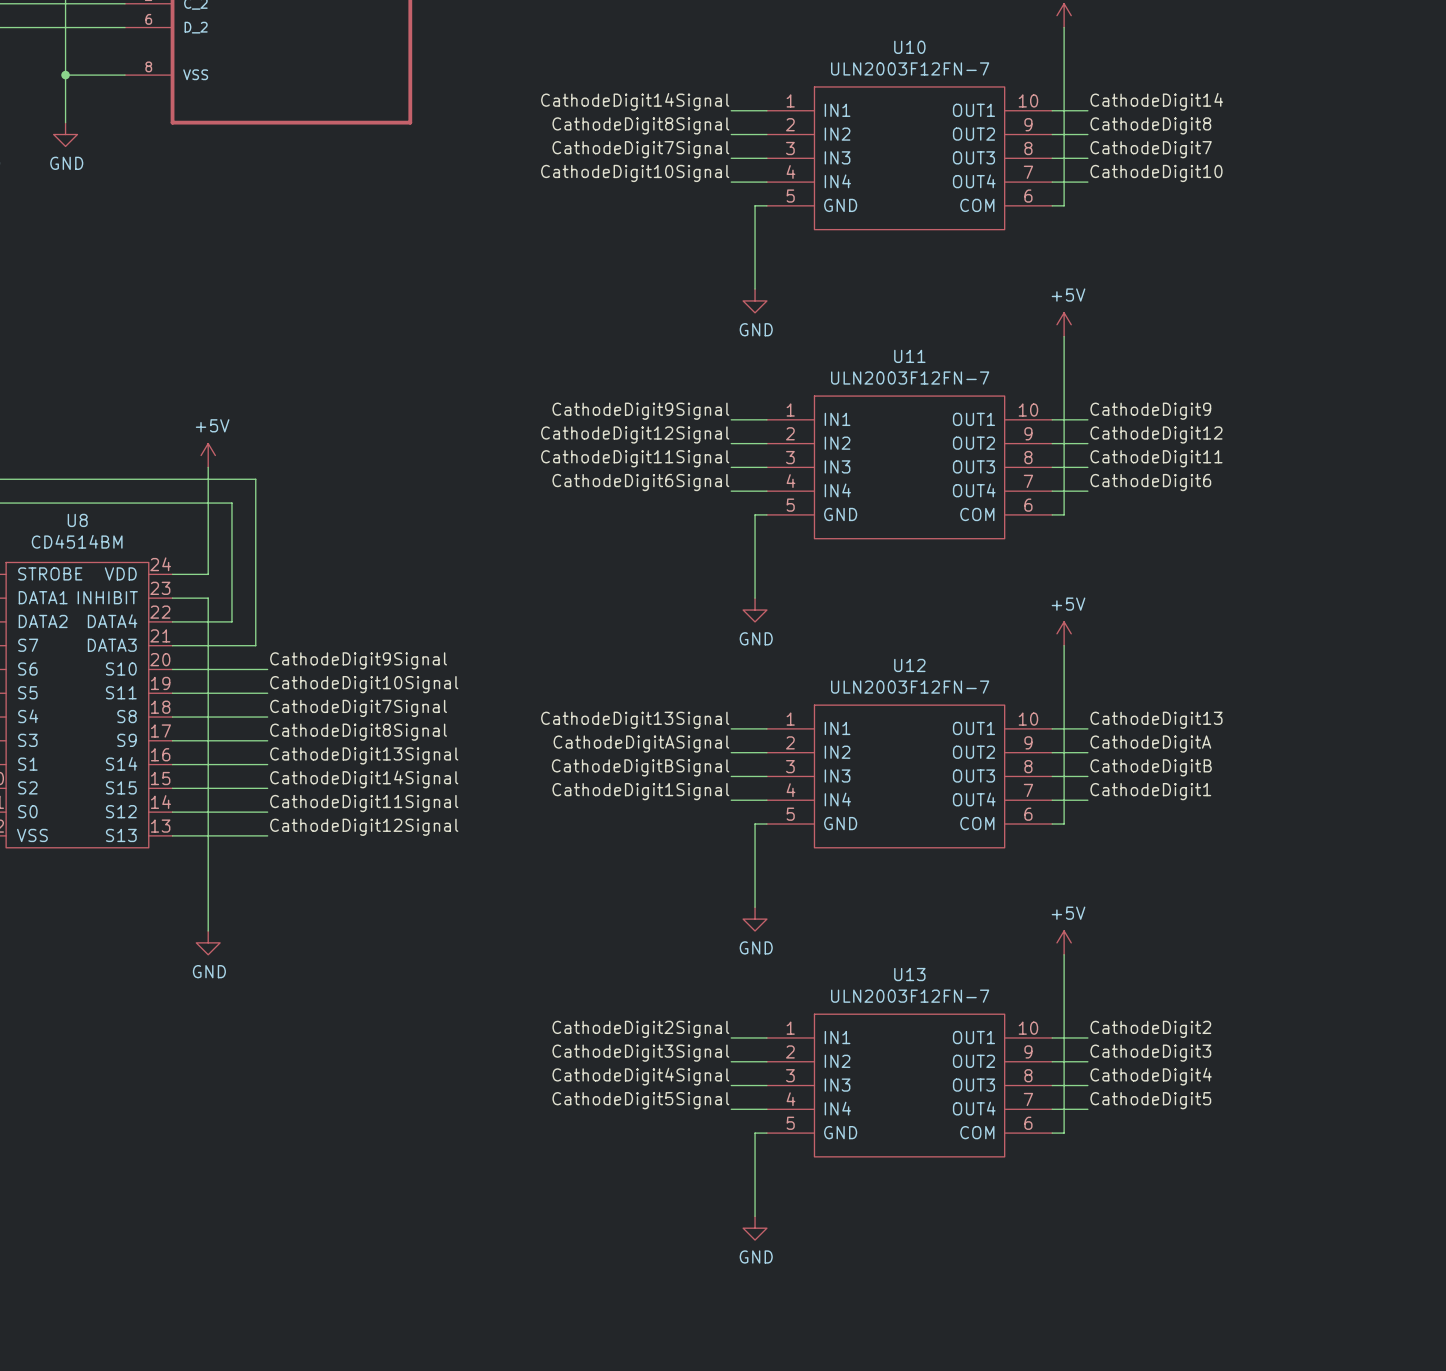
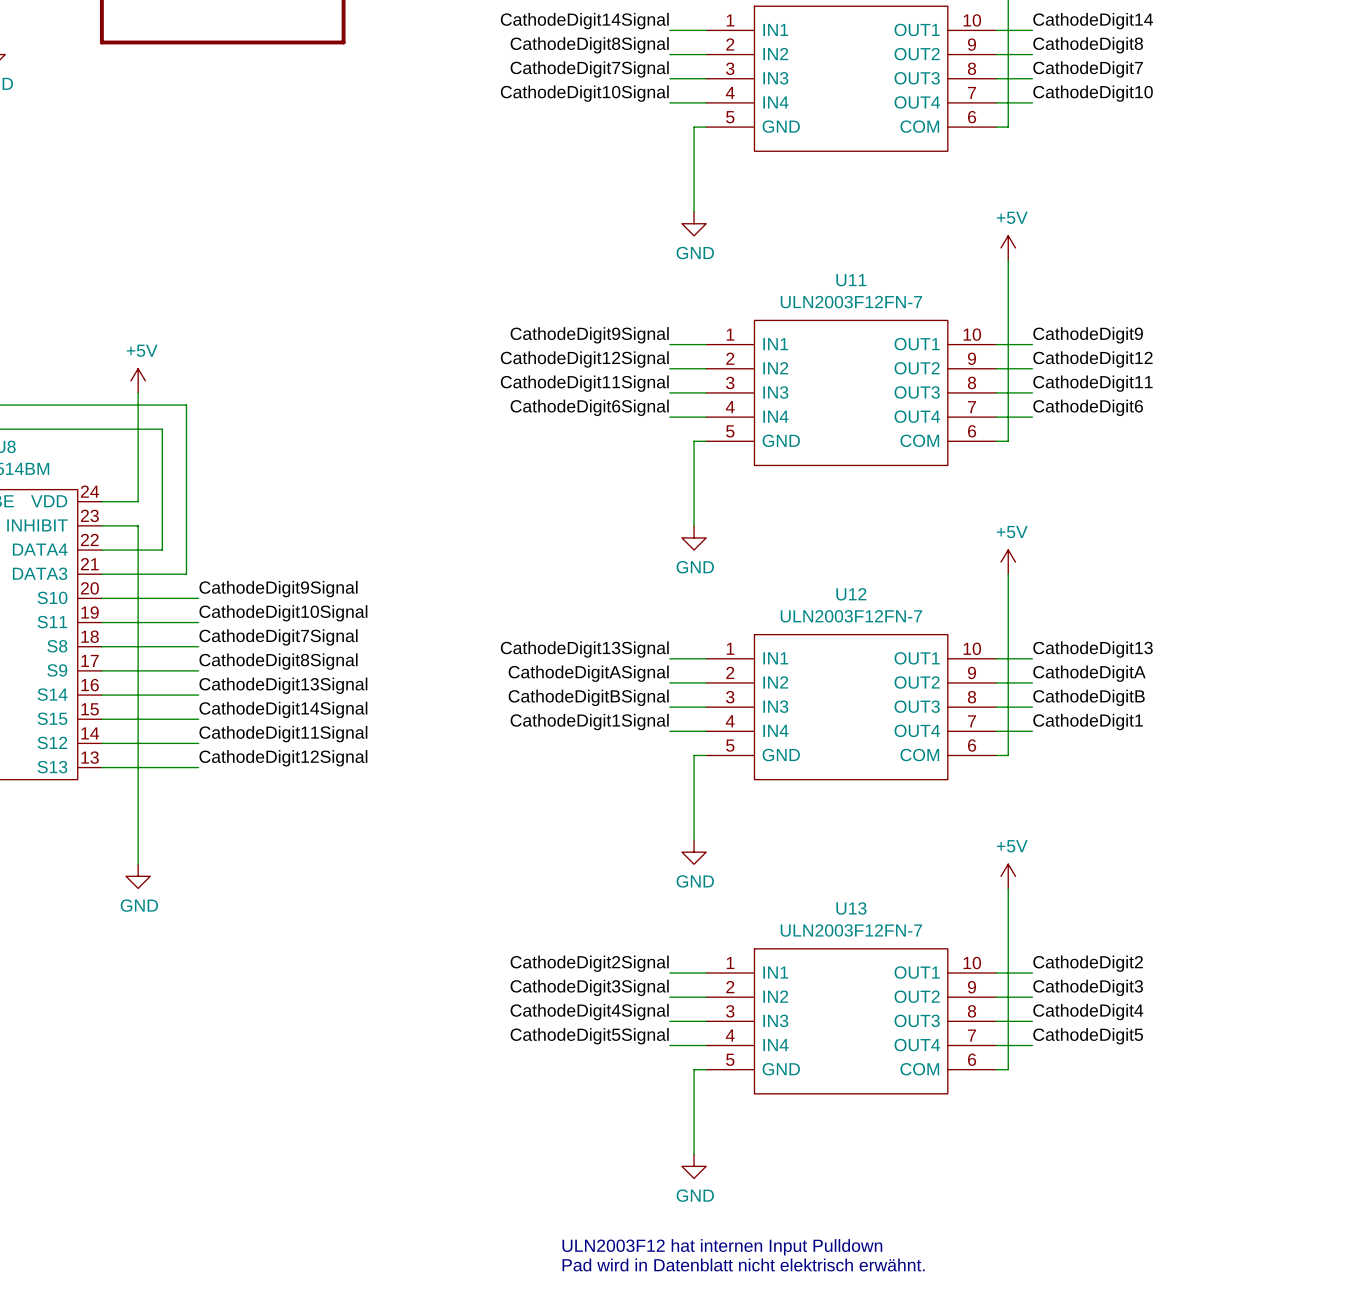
text: none -> ULN2003F12 hat internen Input Pulldown (722, 1247)
text: none -> Pad wird in Datenblatt nicht elektrisch erwähnt. (743, 1264)

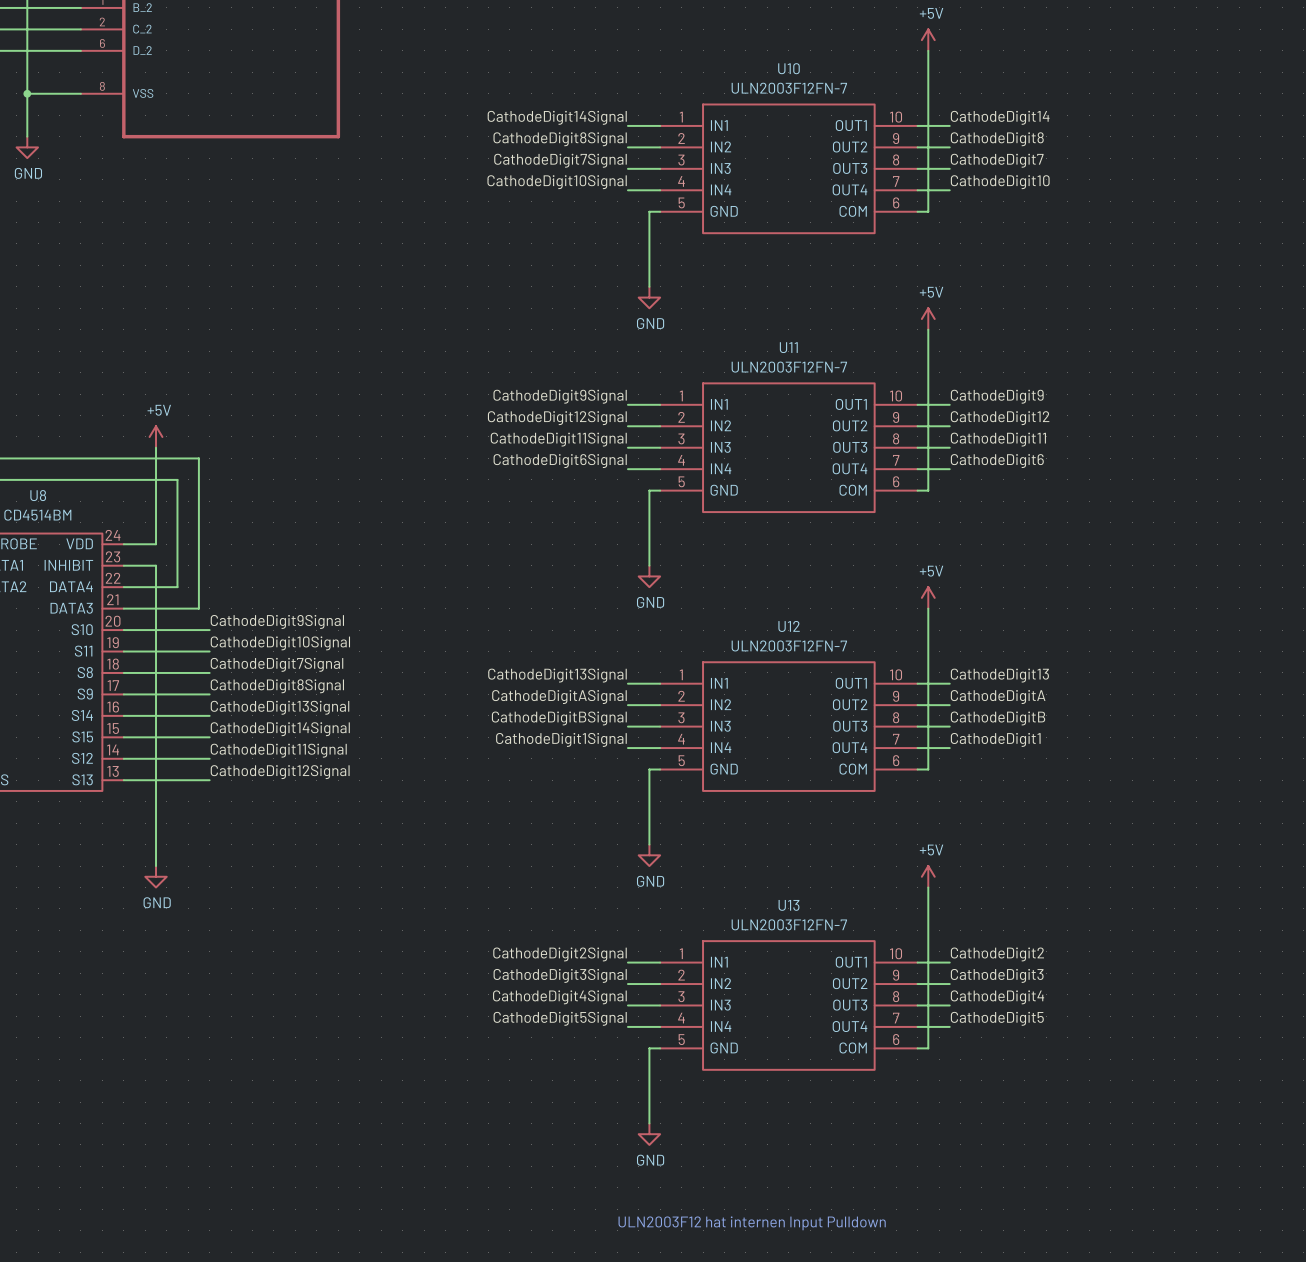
text position: ULN2003F12 hat internen Input Pulldown (722, 1247) -> ULN2003F12 hat internen Input Pulldown (752, 1223)
text: Pad wird in Datenblatt nicht elektrisch erwähnt. (743, 1264) -> none

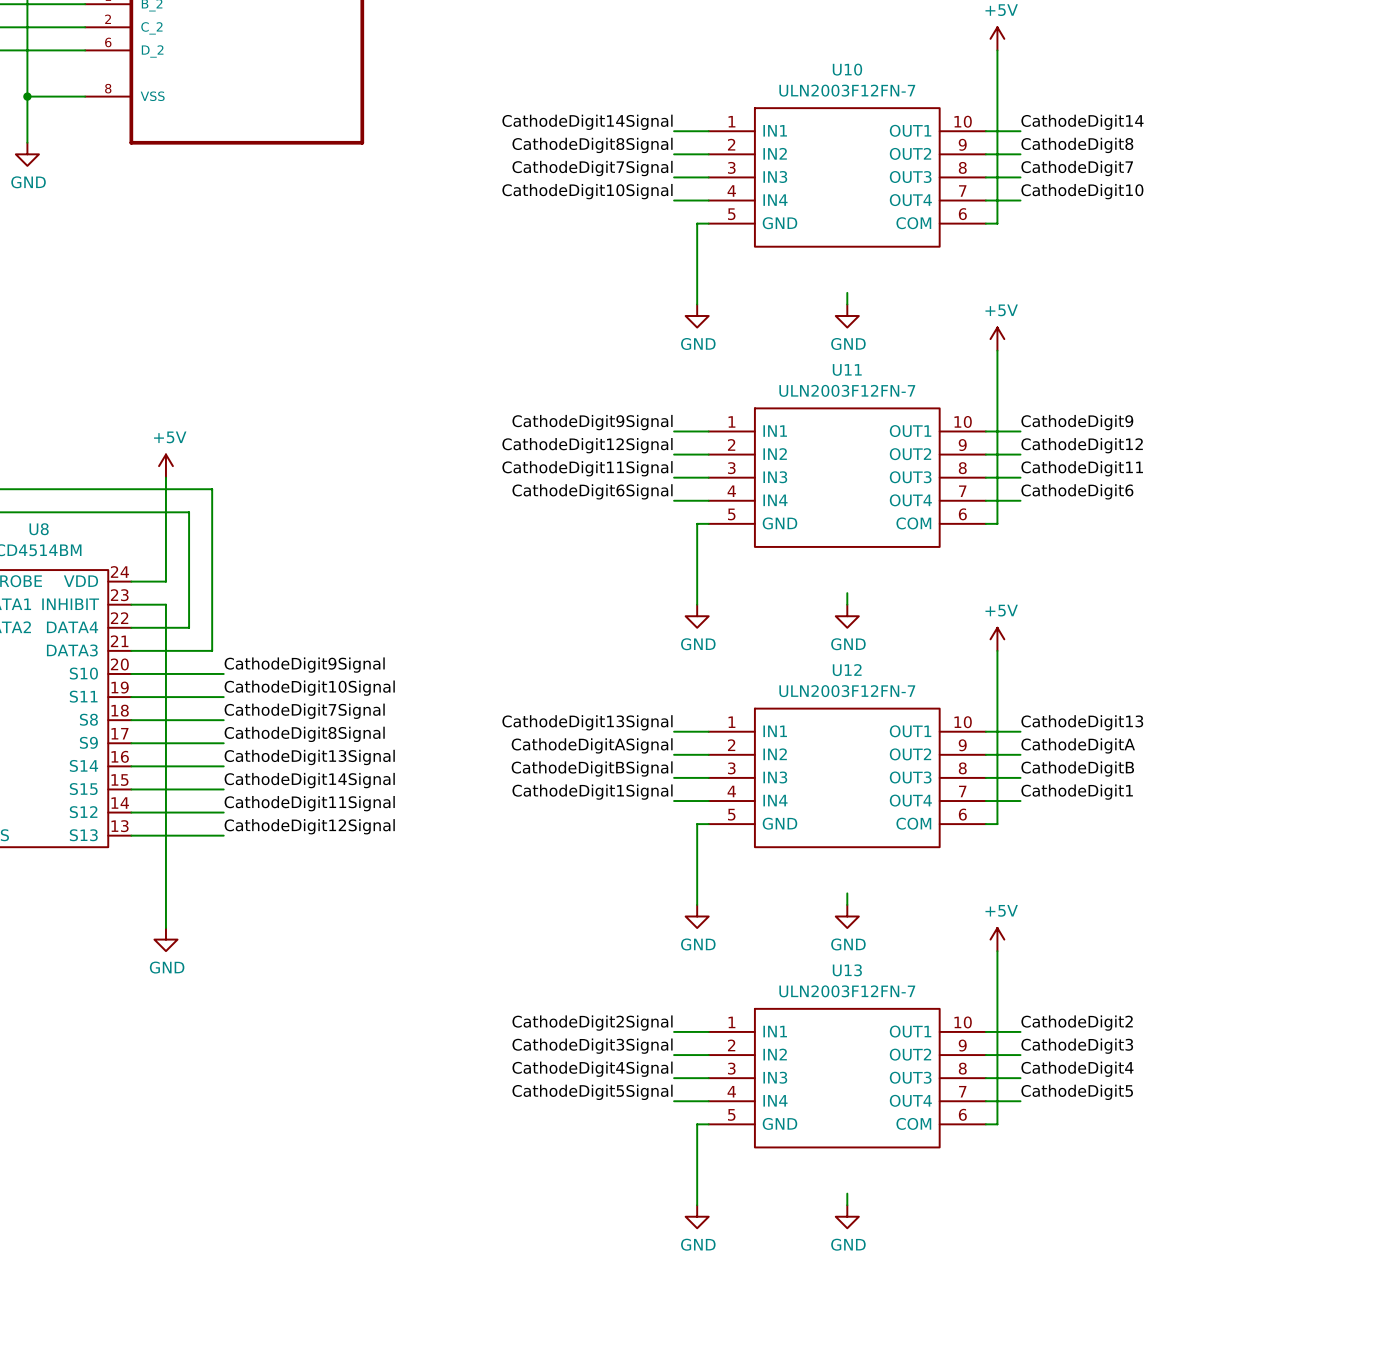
wire: none -> (847, 292) (847, 304)
power symbol: none -> GND (847, 316)
wire: none -> (847, 593) (847, 604)
power symbol: none -> GND (847, 616)
wire: none -> (847, 893) (847, 904)
power symbol: none -> GND (847, 916)
wire: none -> (847, 1193) (847, 1205)
power symbol: none -> GND (847, 1216)
text: ULN2003F12 hat internen Input Pulldown (752, 1223) -> none

